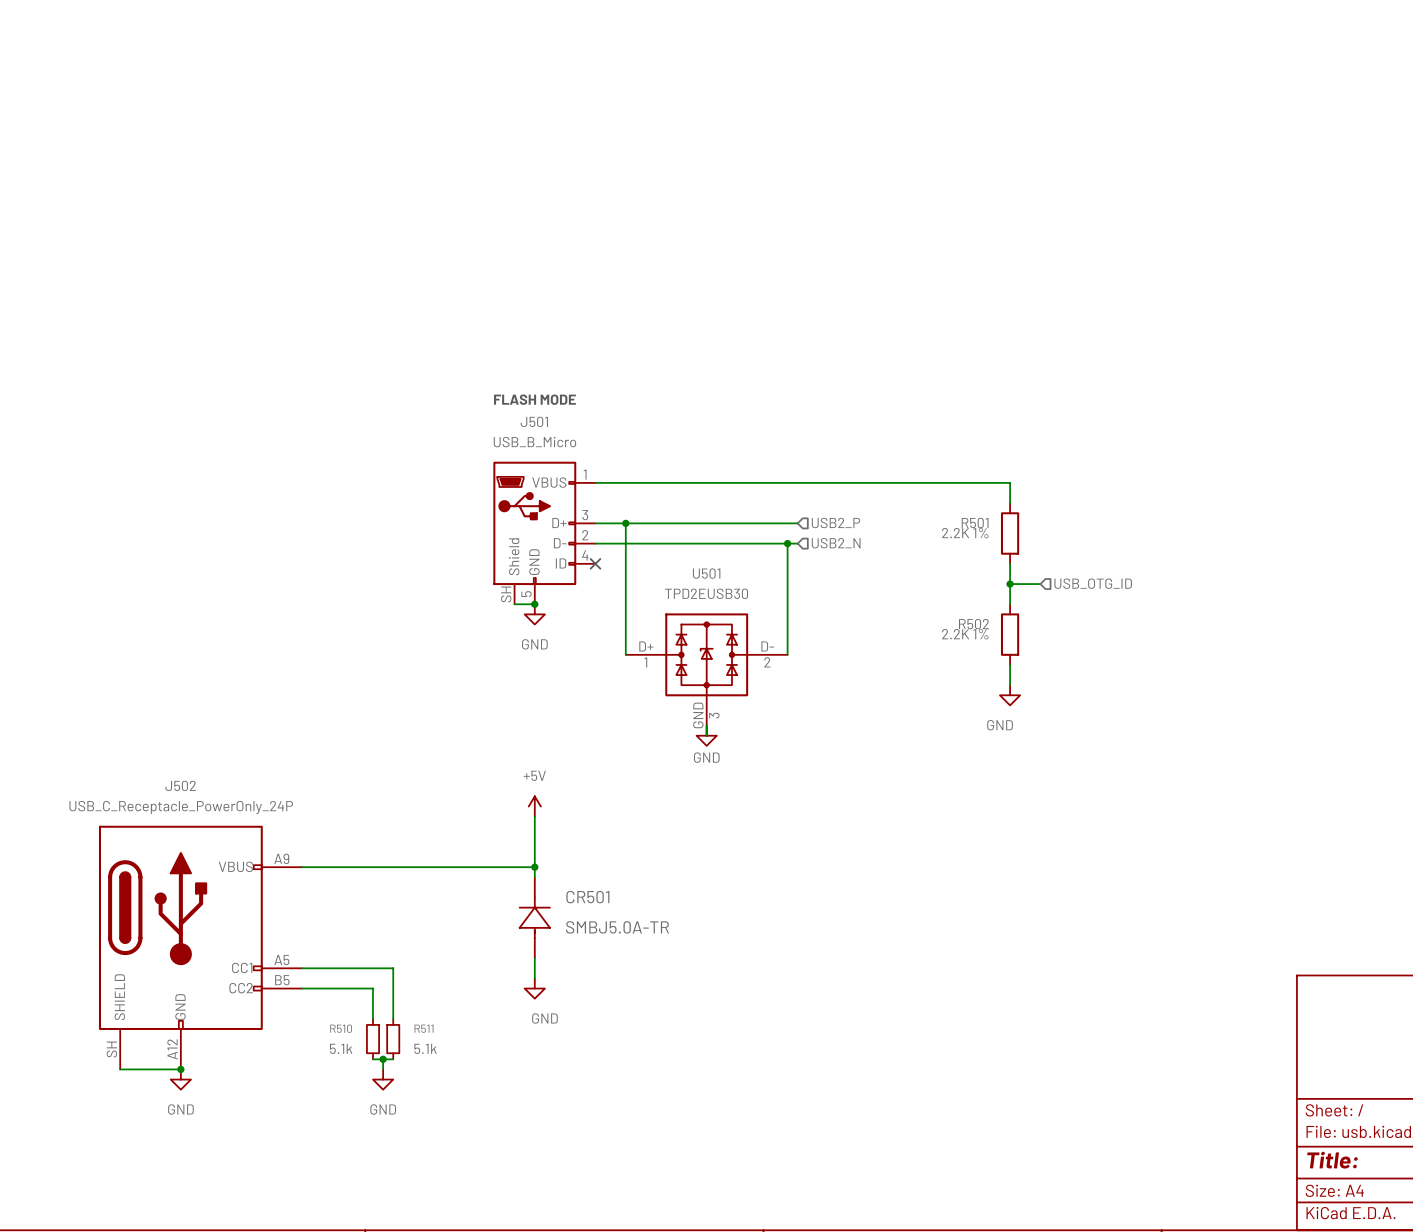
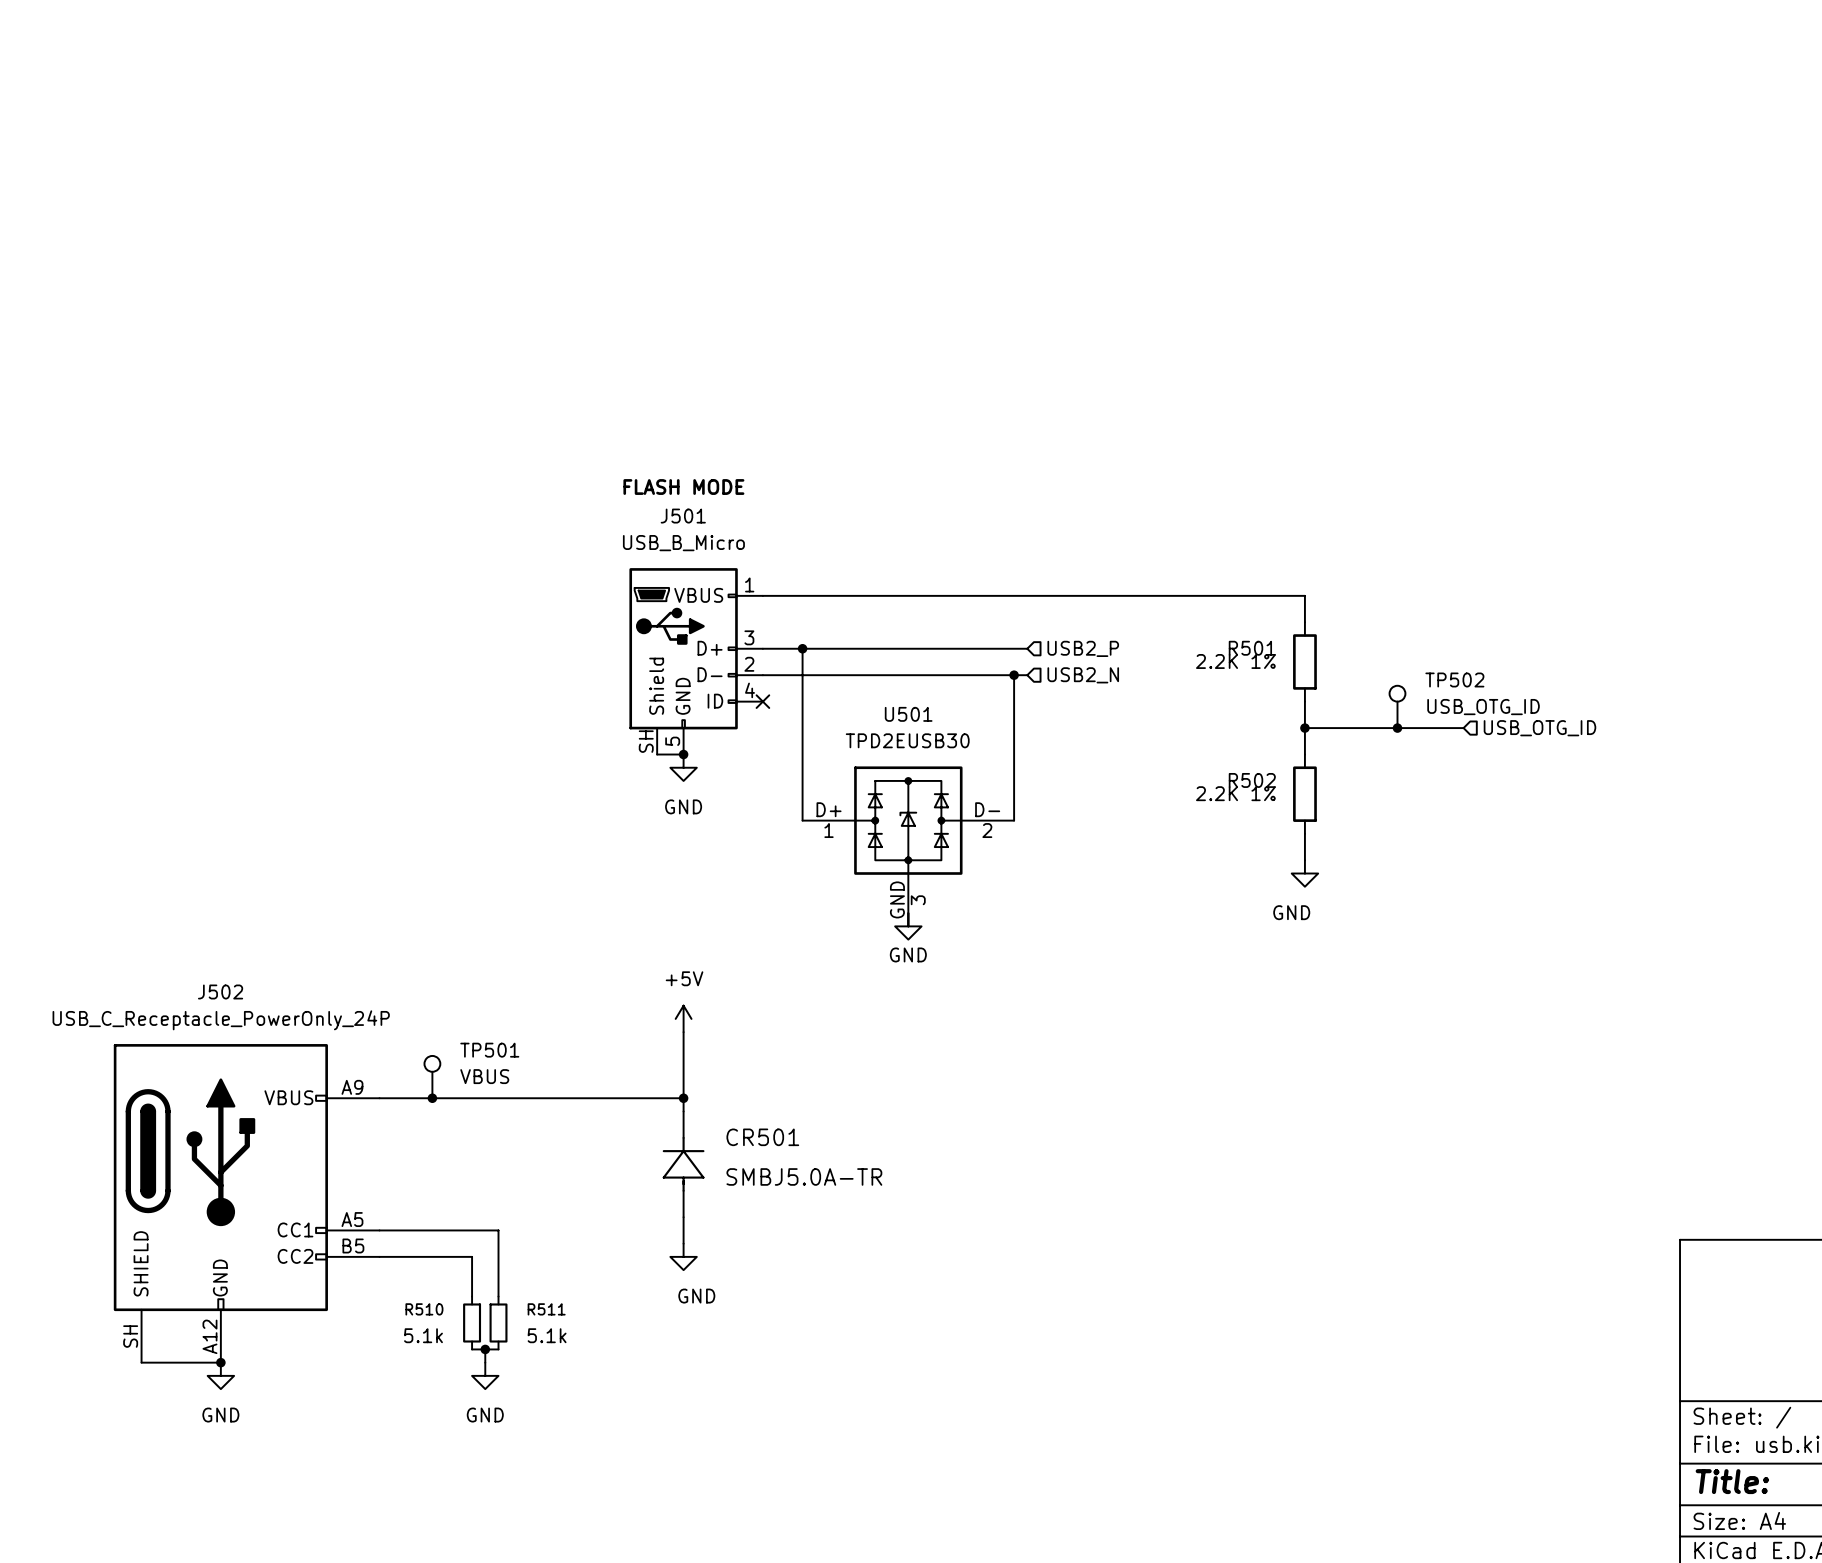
TP502: none -> USB_OTG_ID (1397, 706)
hierarchical label position: USB_OTG_ID (1093, 583) -> USB_OTG_ID (1539, 728)
wire: none -> (1344, 728) (1463, 728)
junction: none -> (1397, 728)
TP501: none -> VBUS (432, 1077)
junction: none -> (432, 1098)

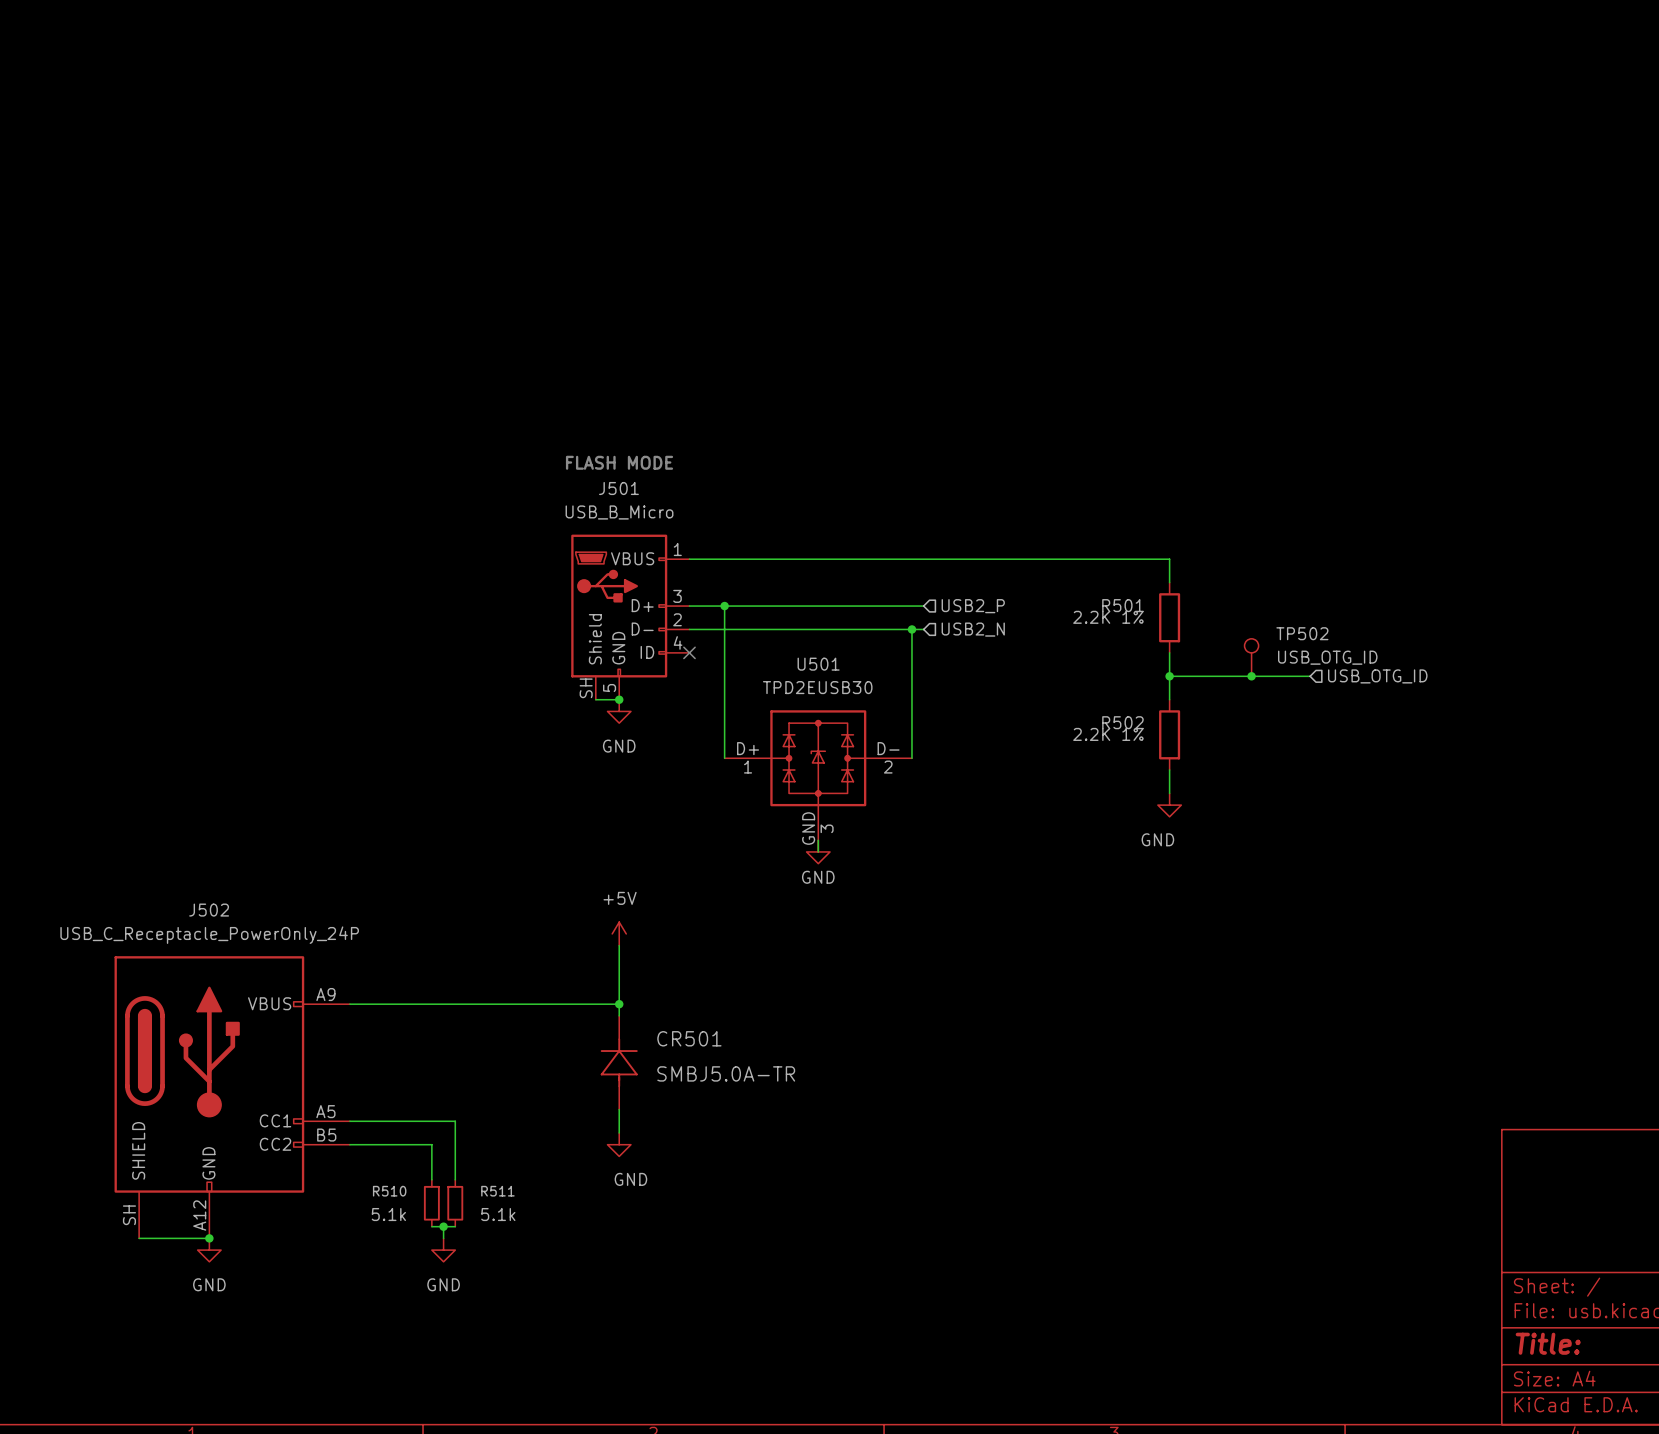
TP501: VBUS (432, 1077) -> none
junction: (432, 1098) -> none

